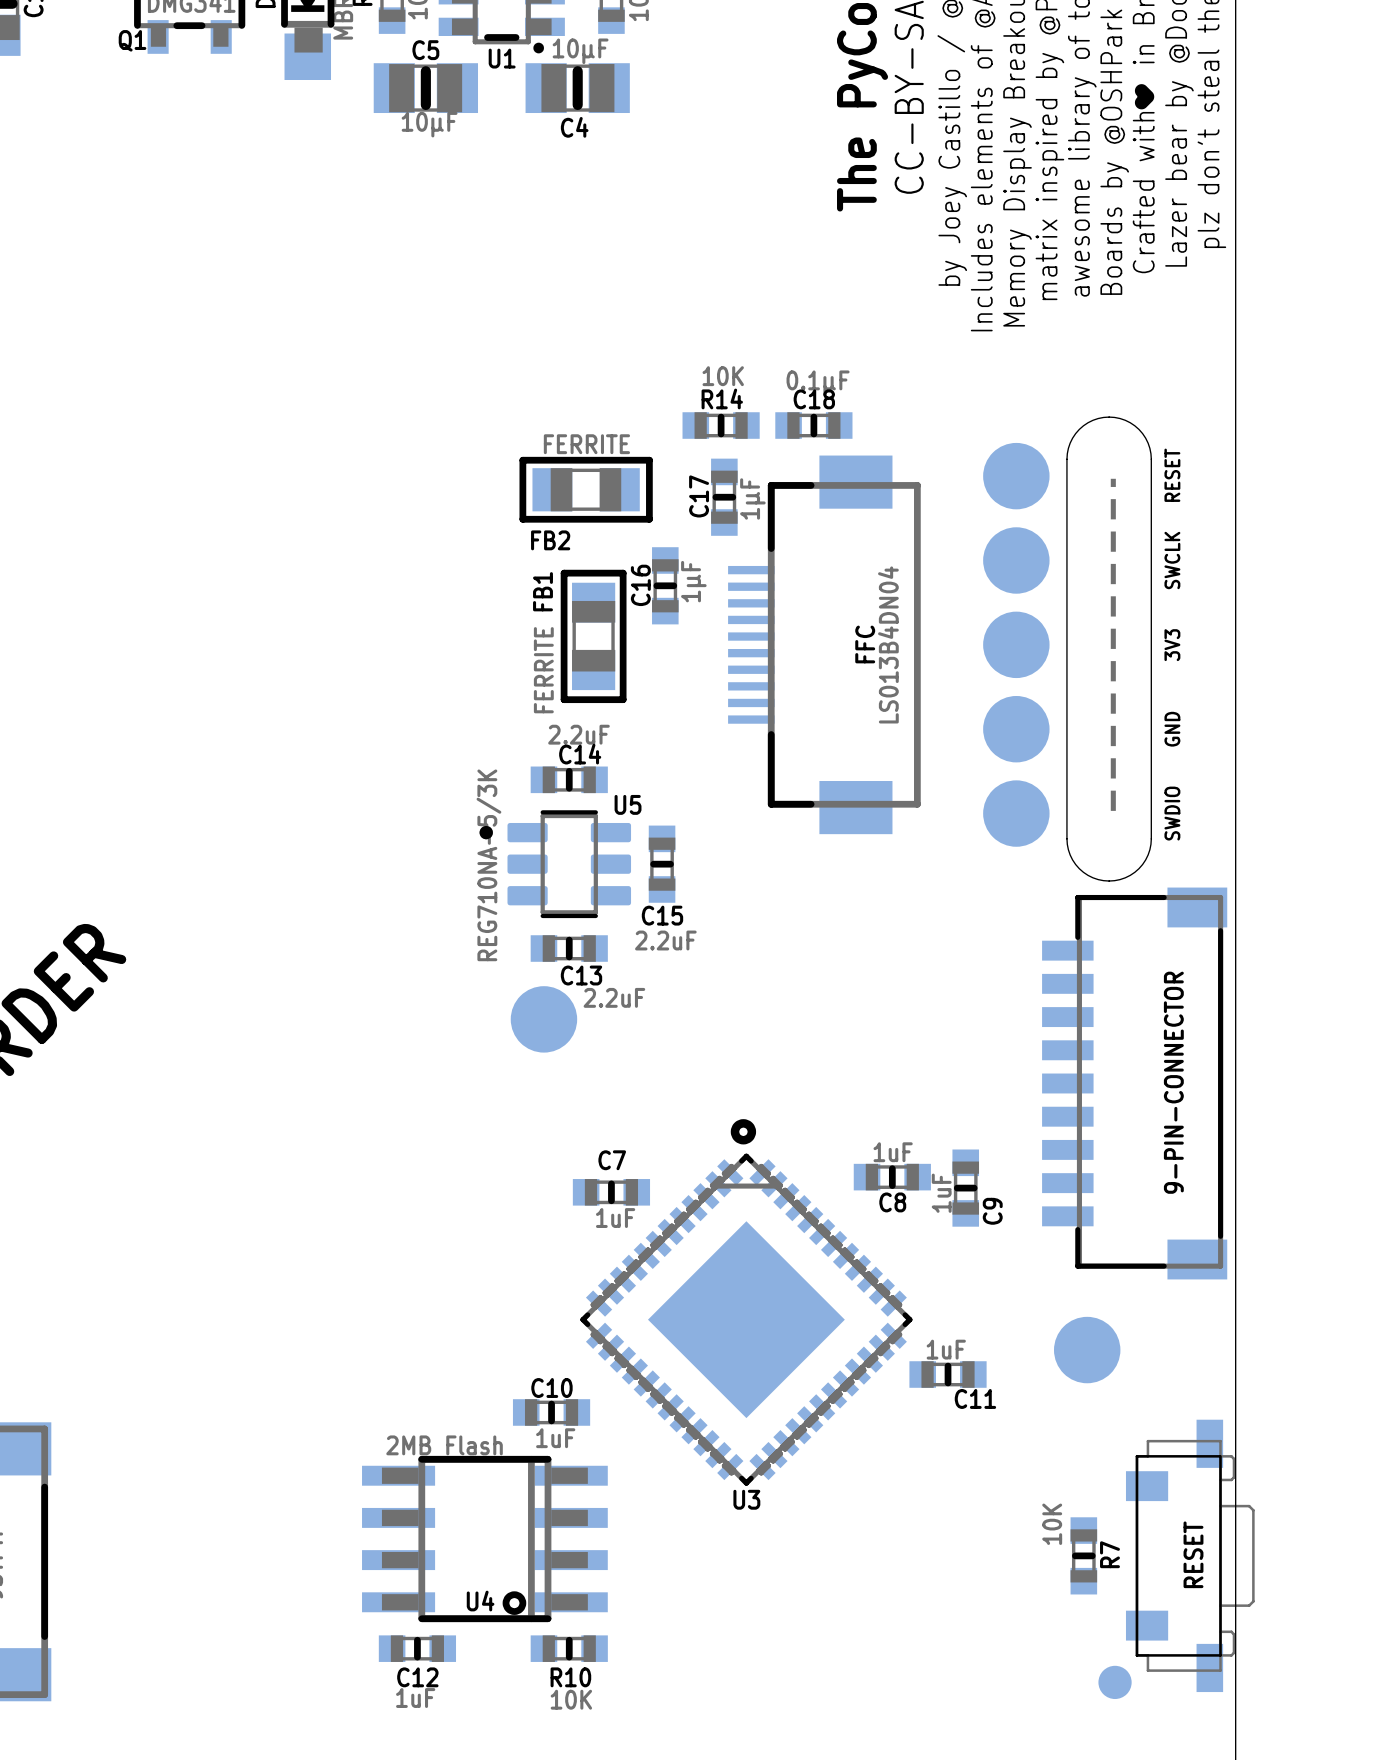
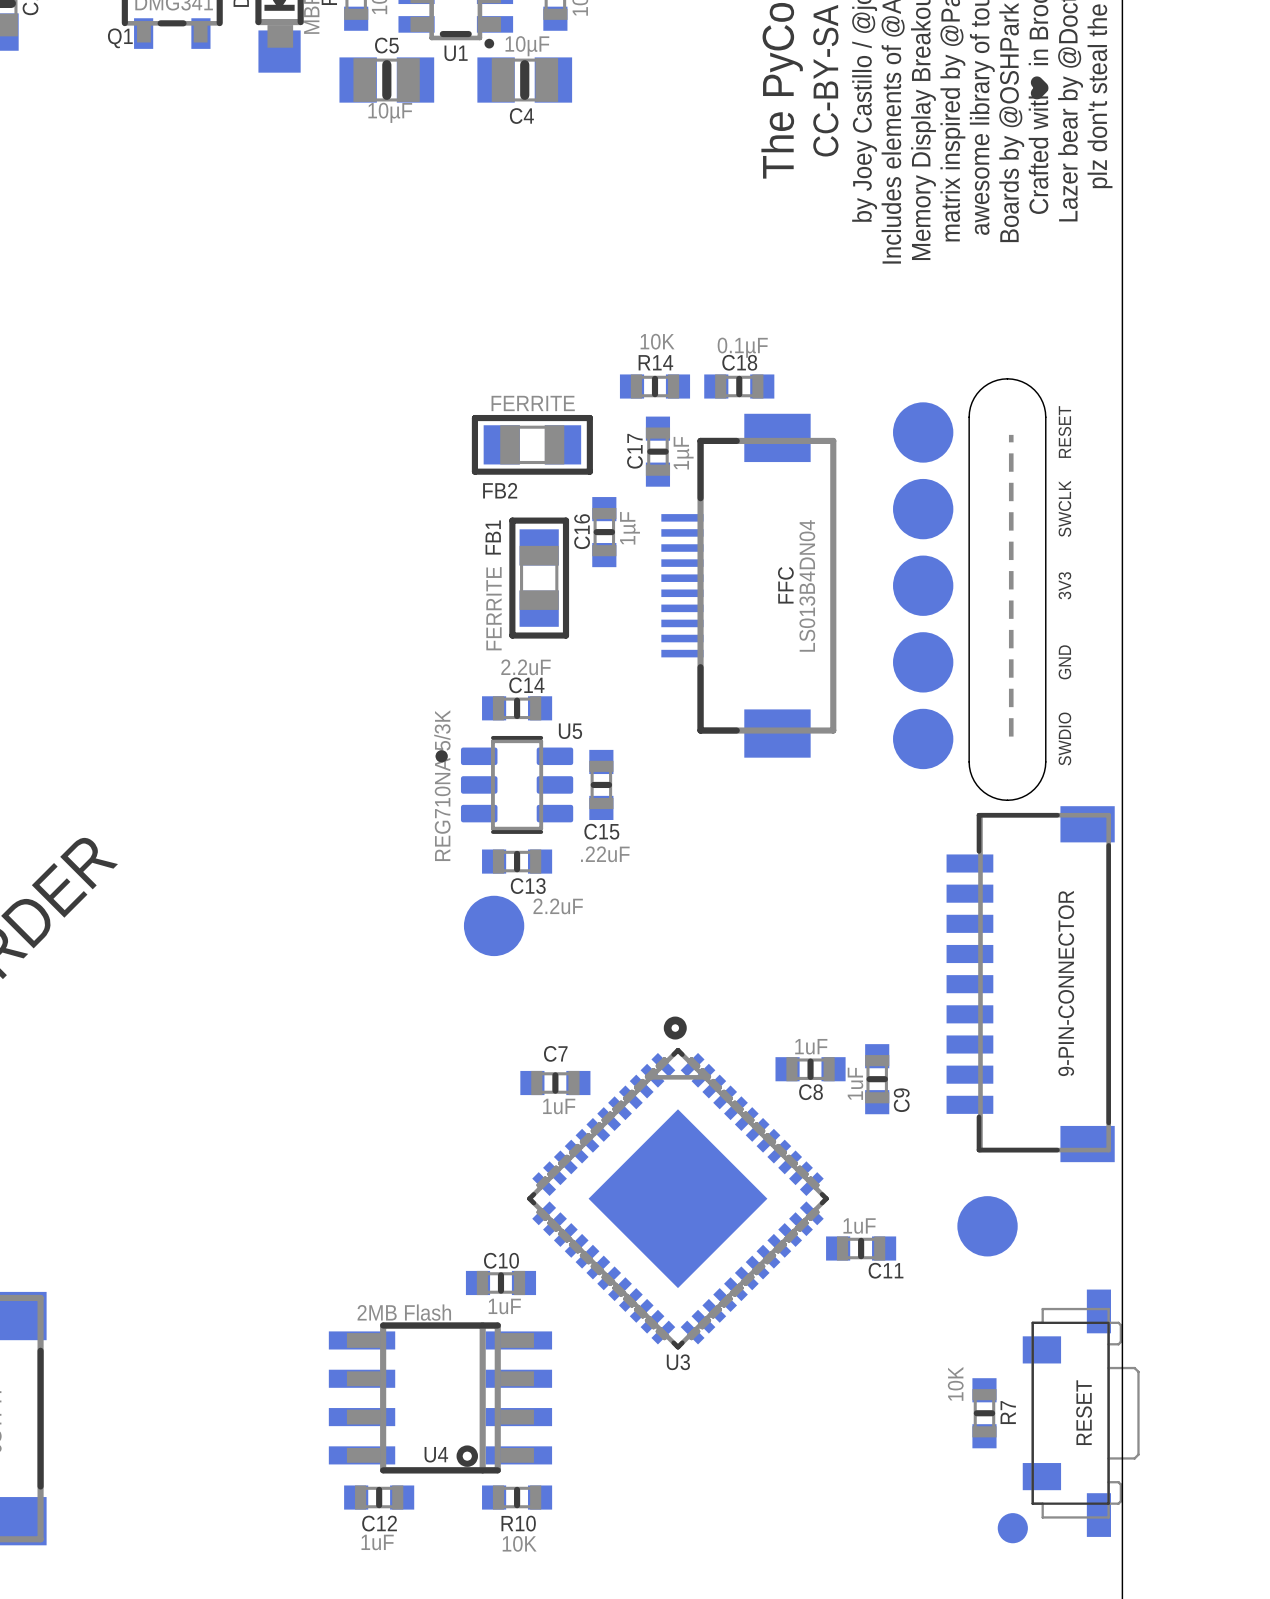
C15 value: 2.2uF (665, 940) -> .22uF (605, 854)

